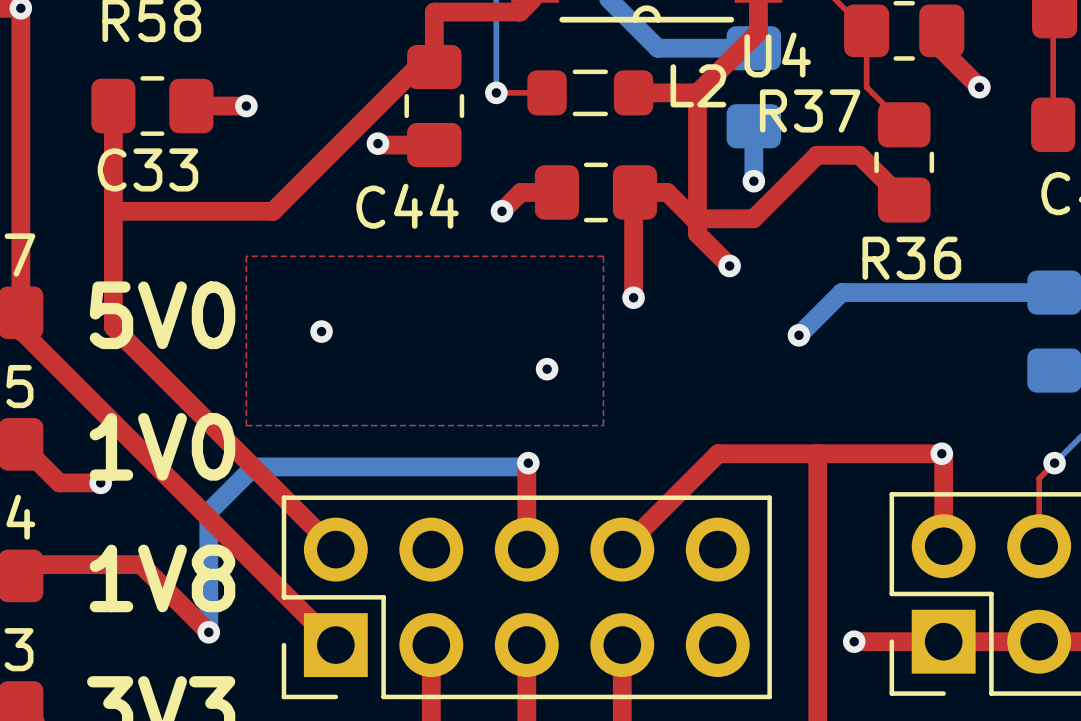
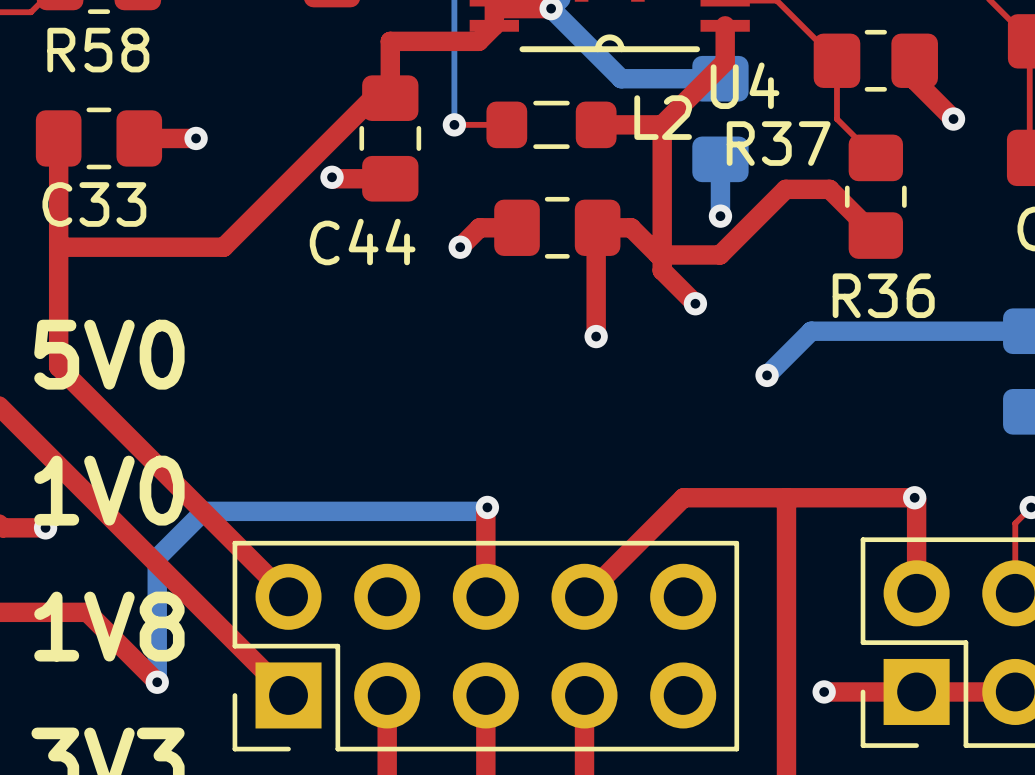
top zone outline: (246, 256) (246, 425) (603, 425) (603, 256) (246, 256) -> none
via: (321, 331) -> none
via: (547, 369) -> none

